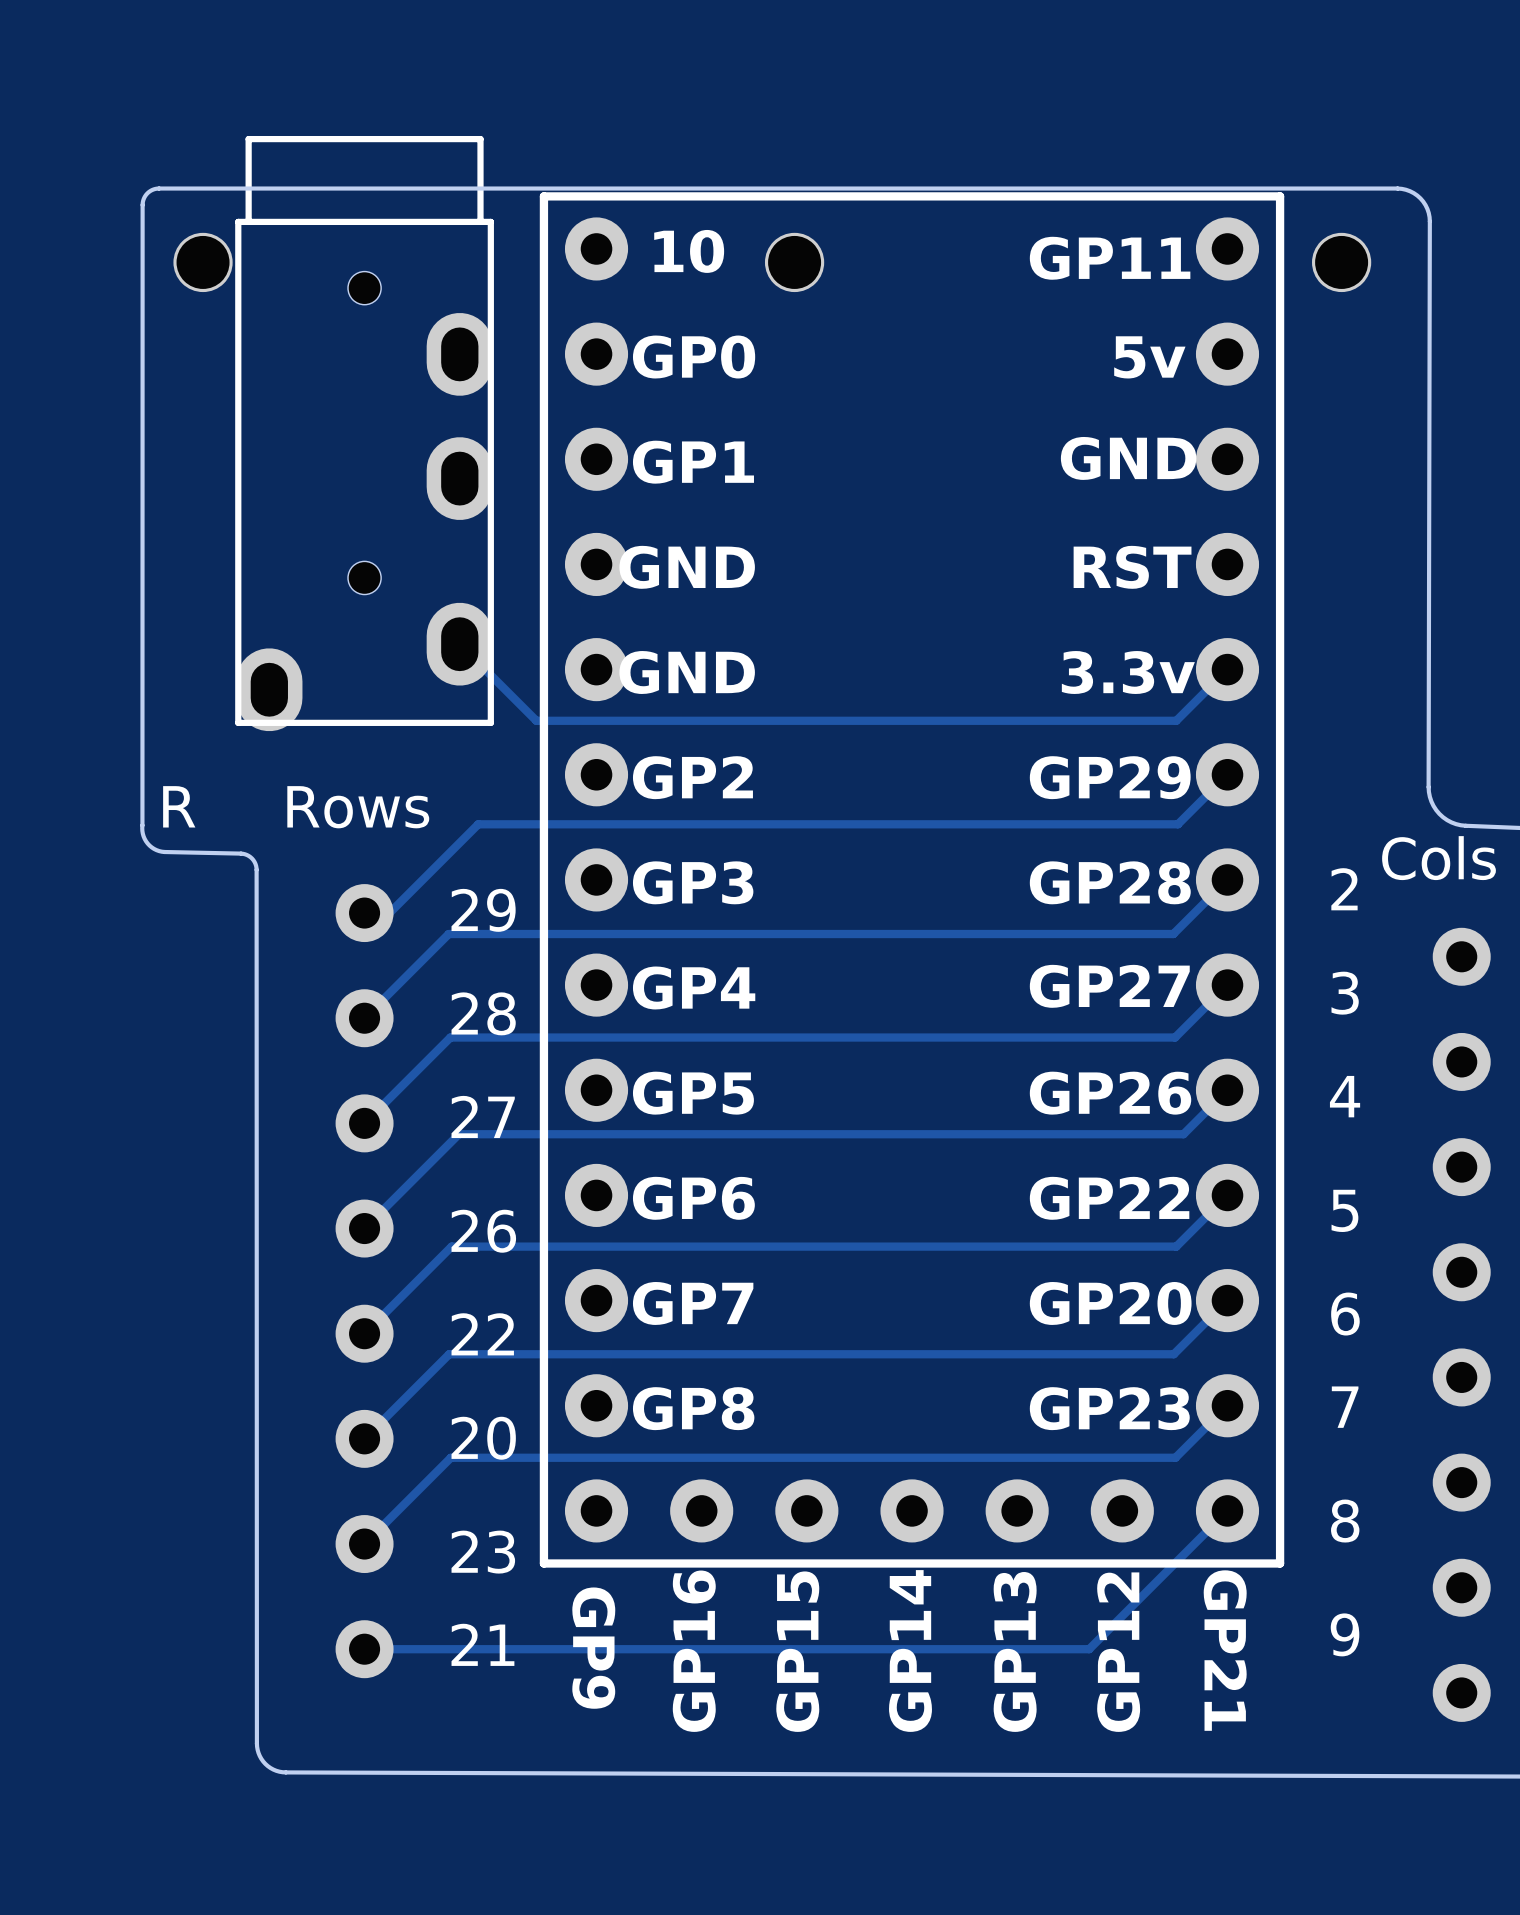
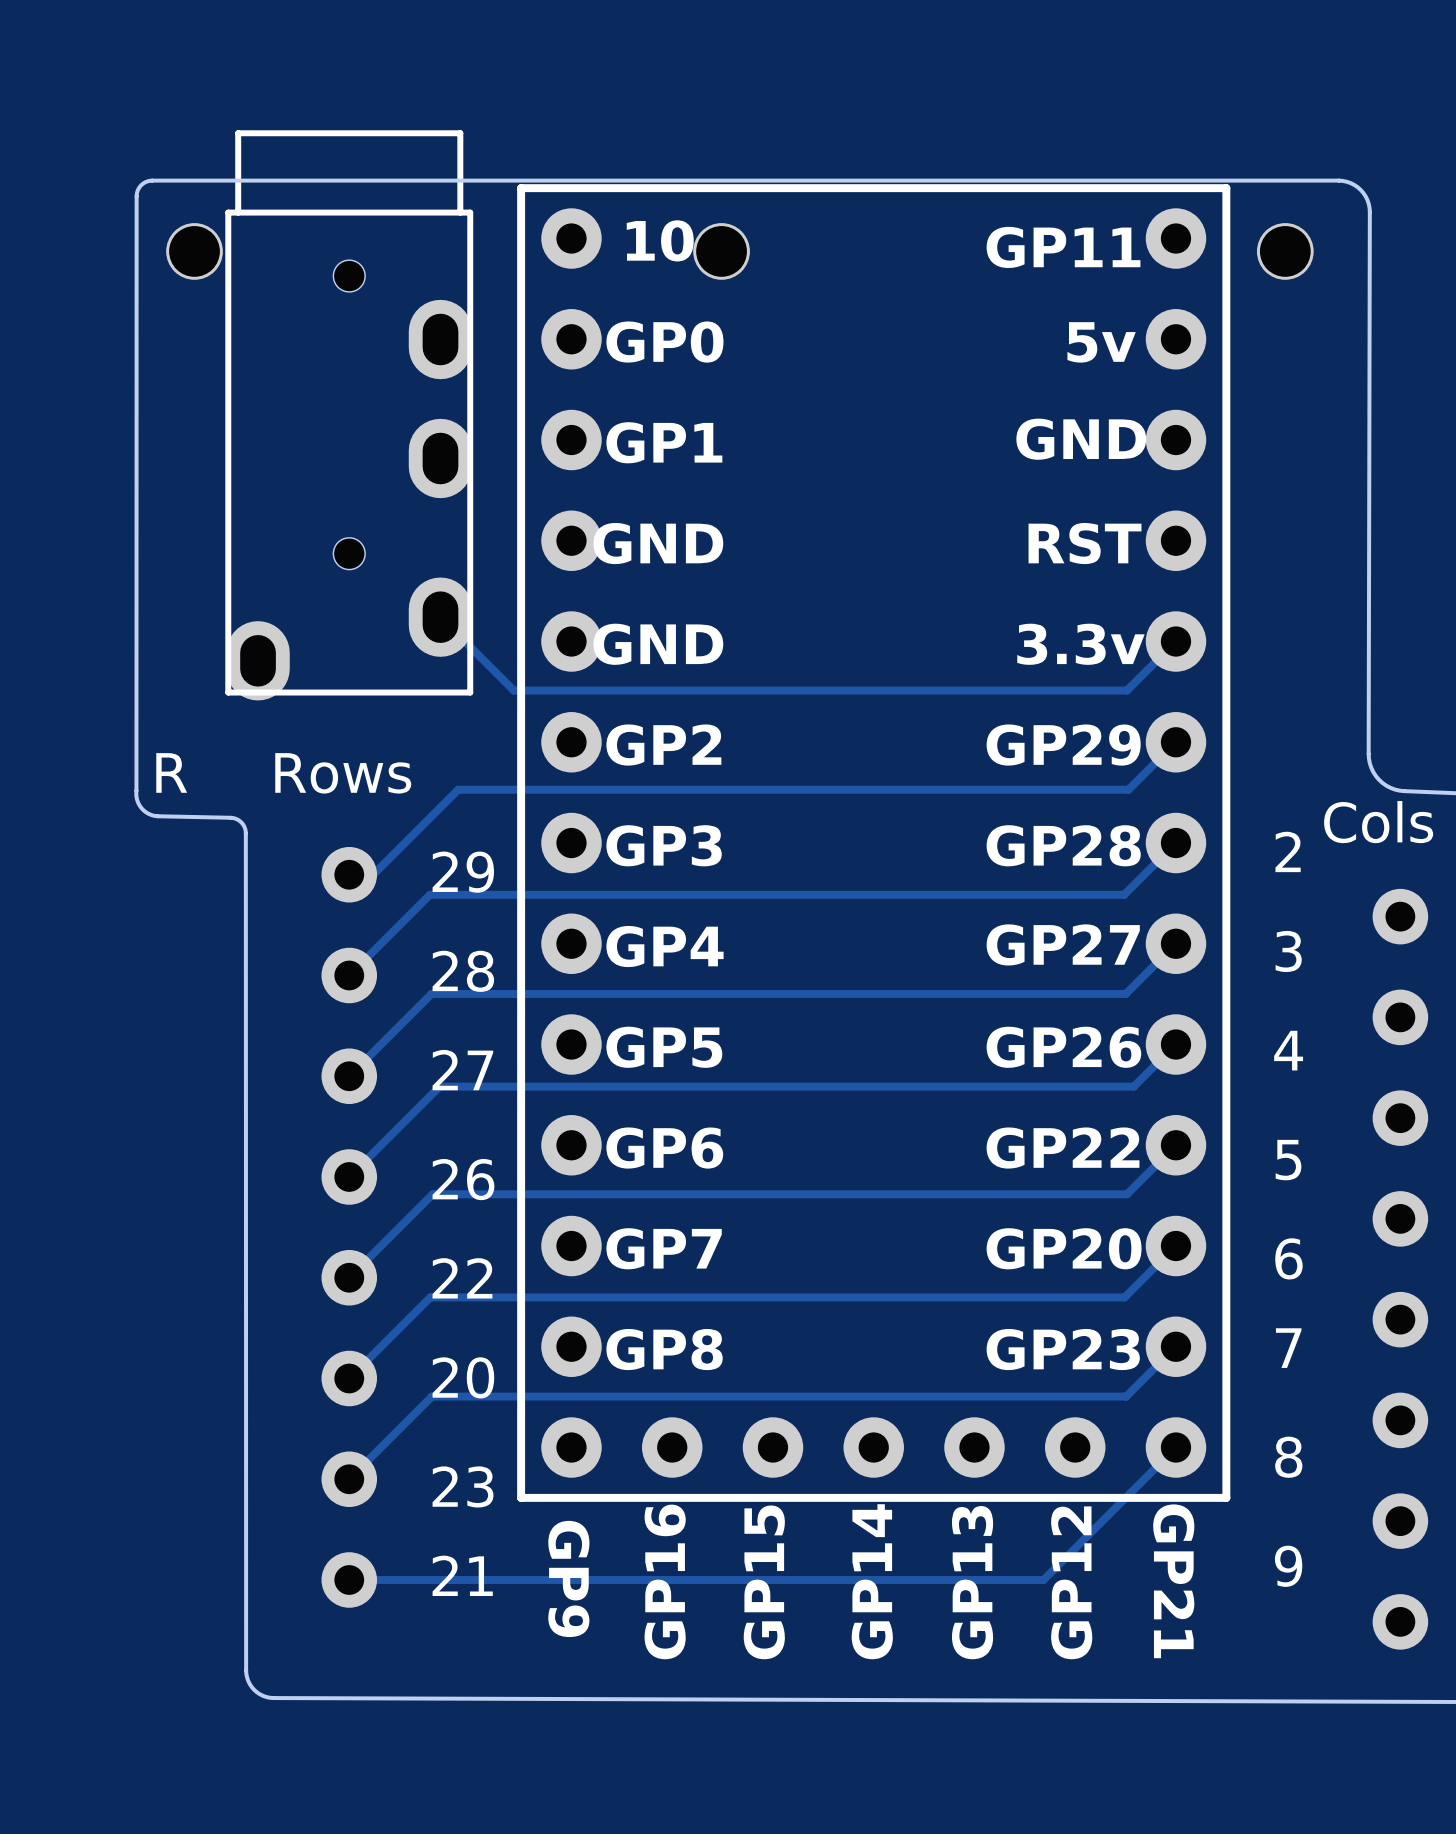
part position: (794, 262) -> (721, 251)

